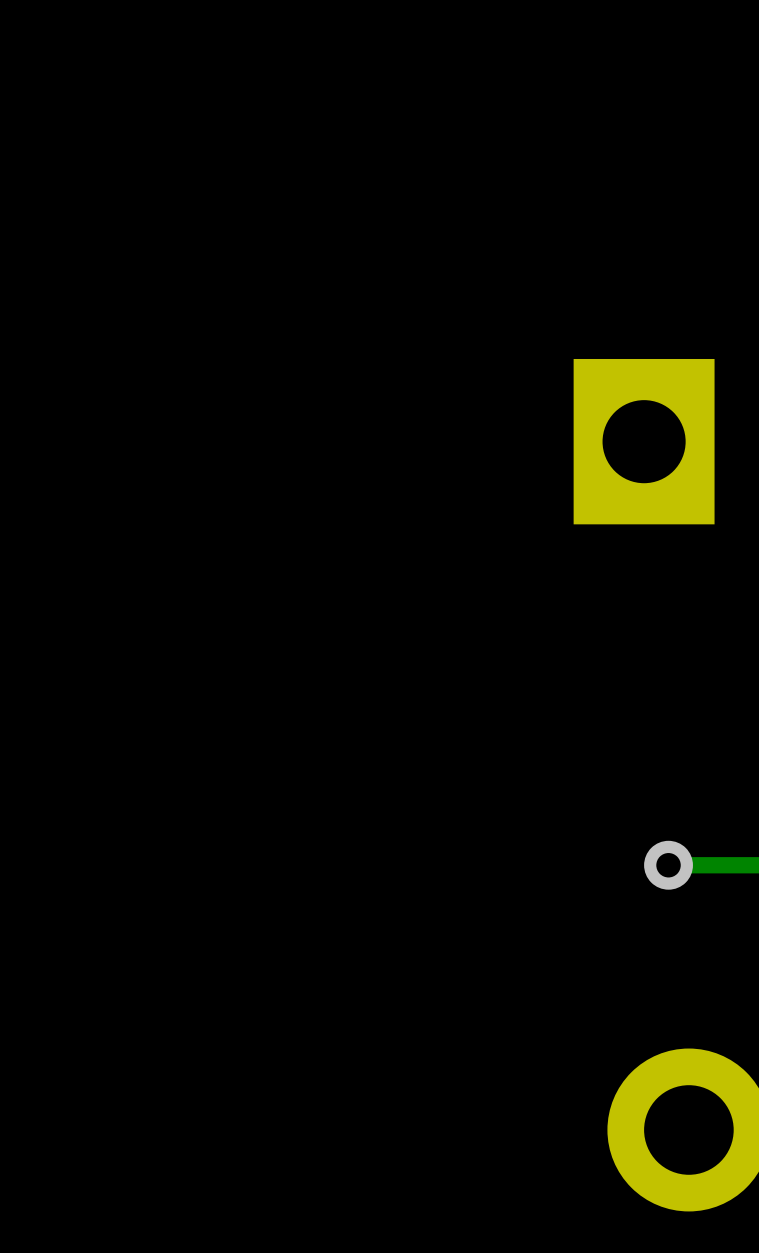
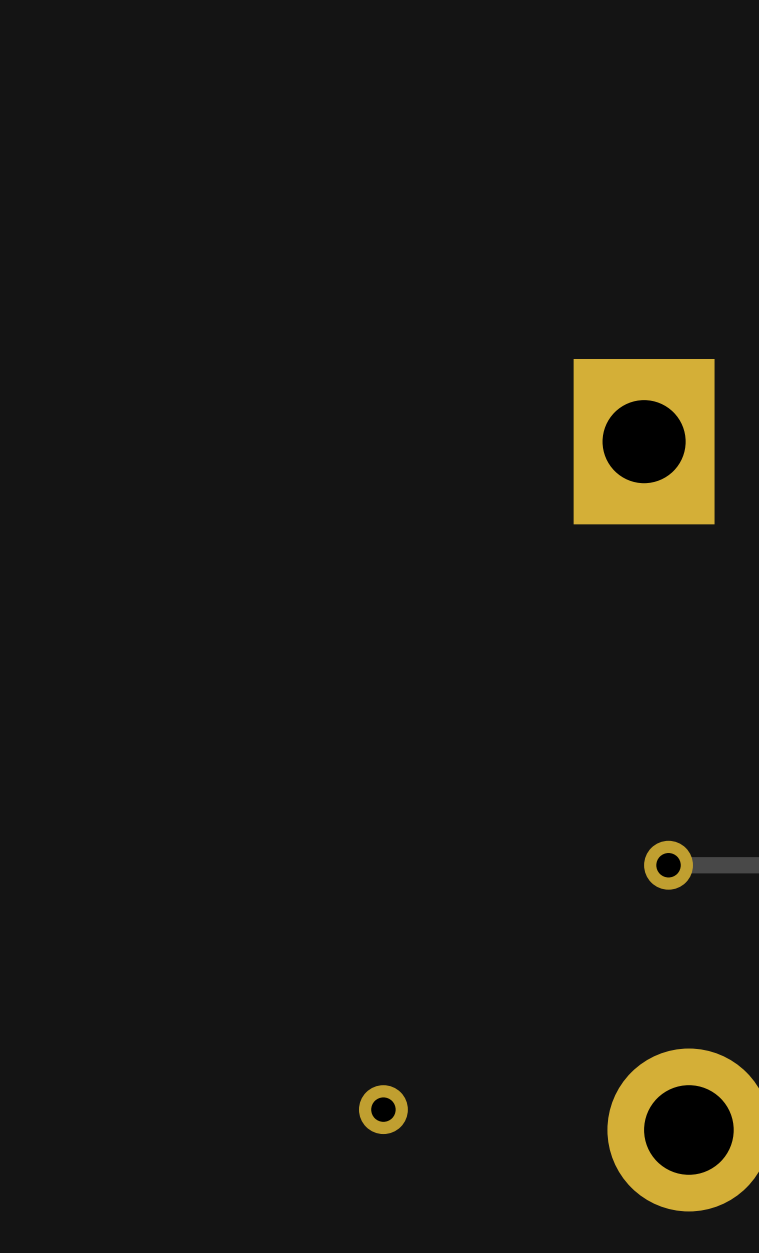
via: none -> (383, 1109)

